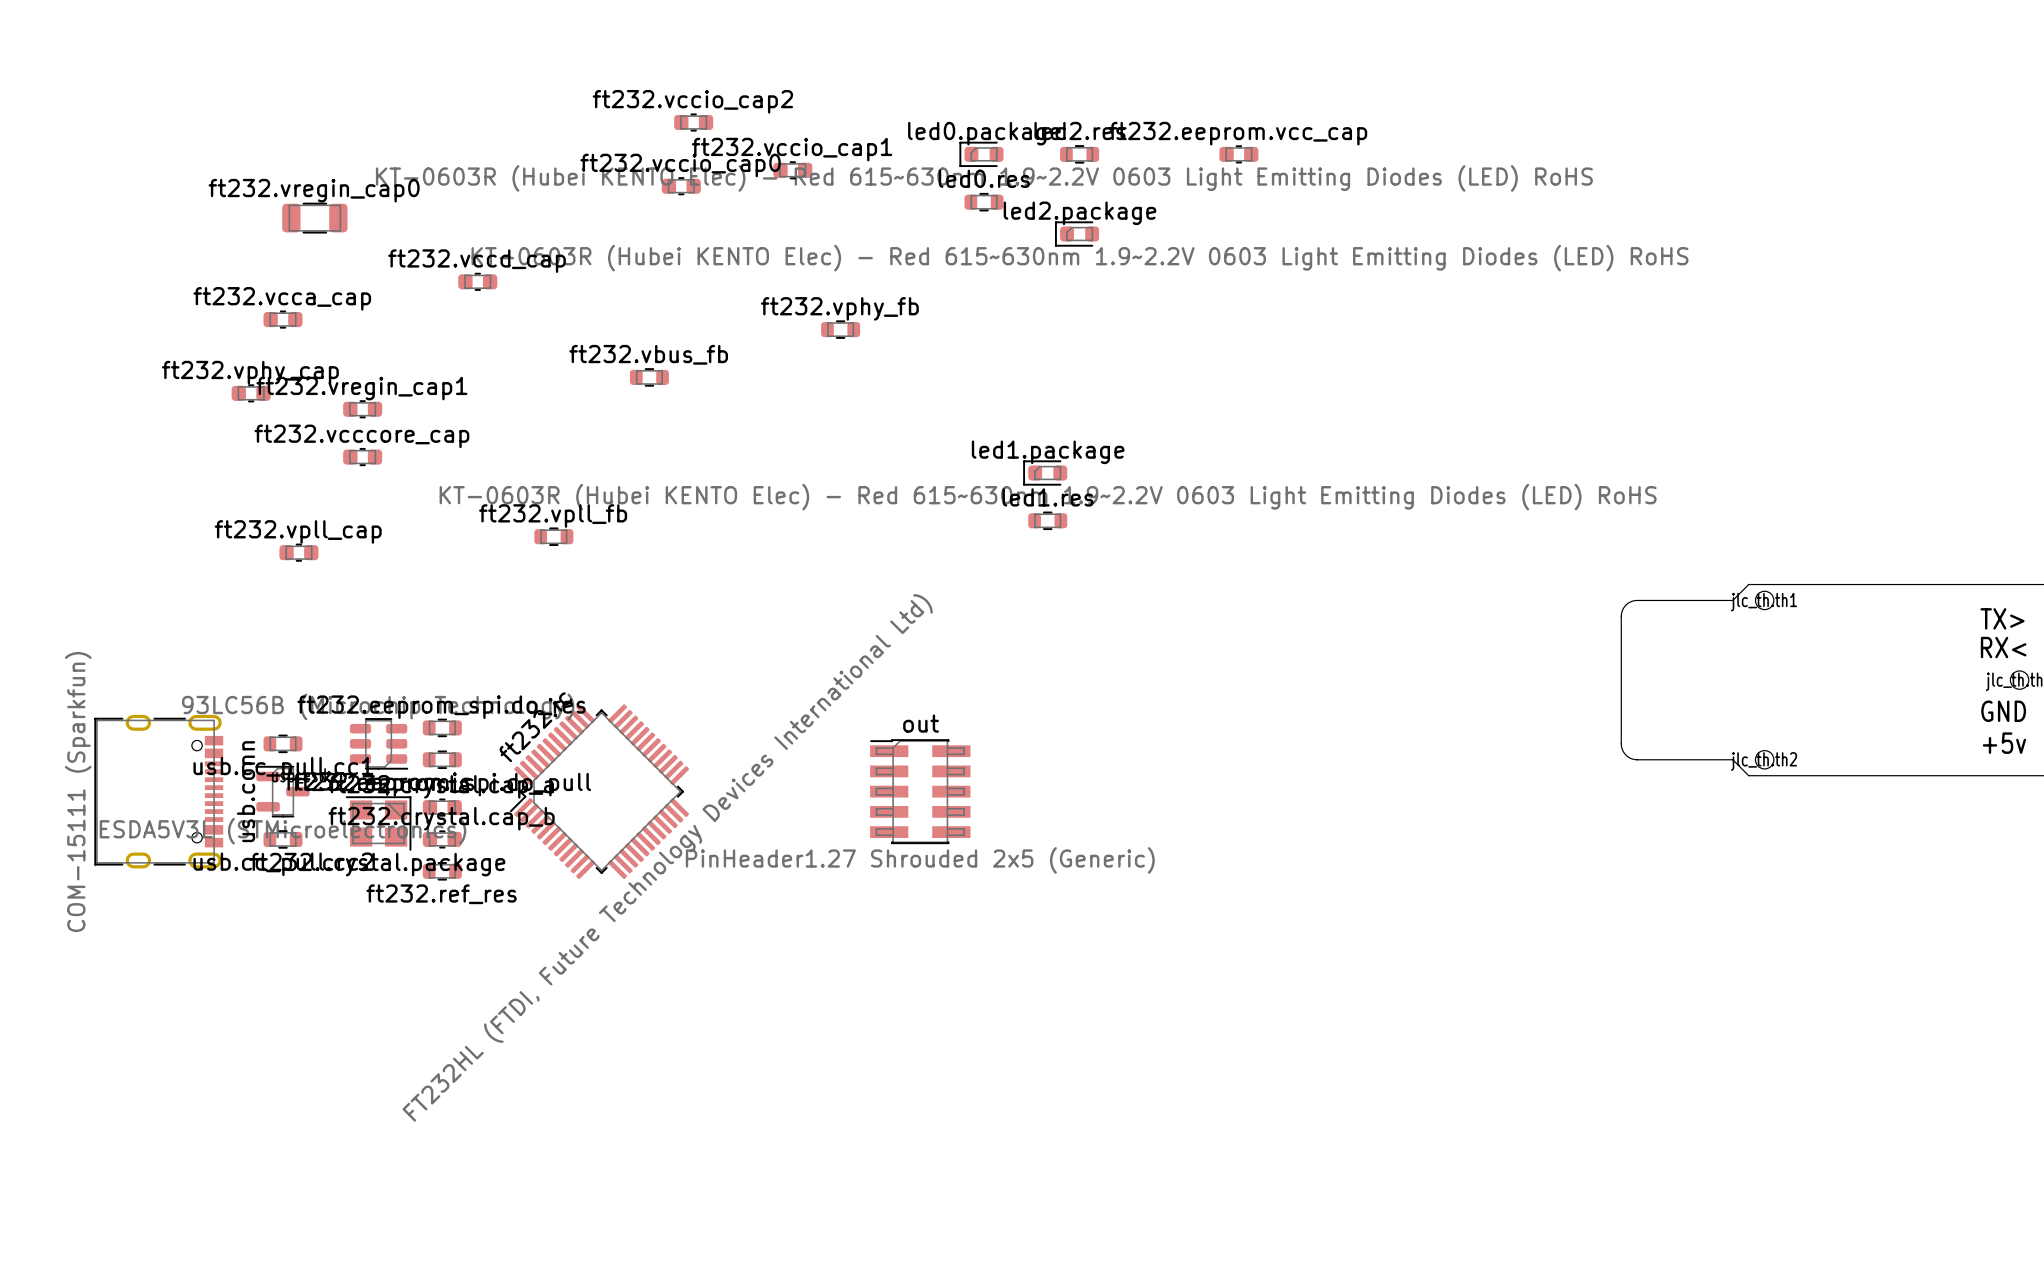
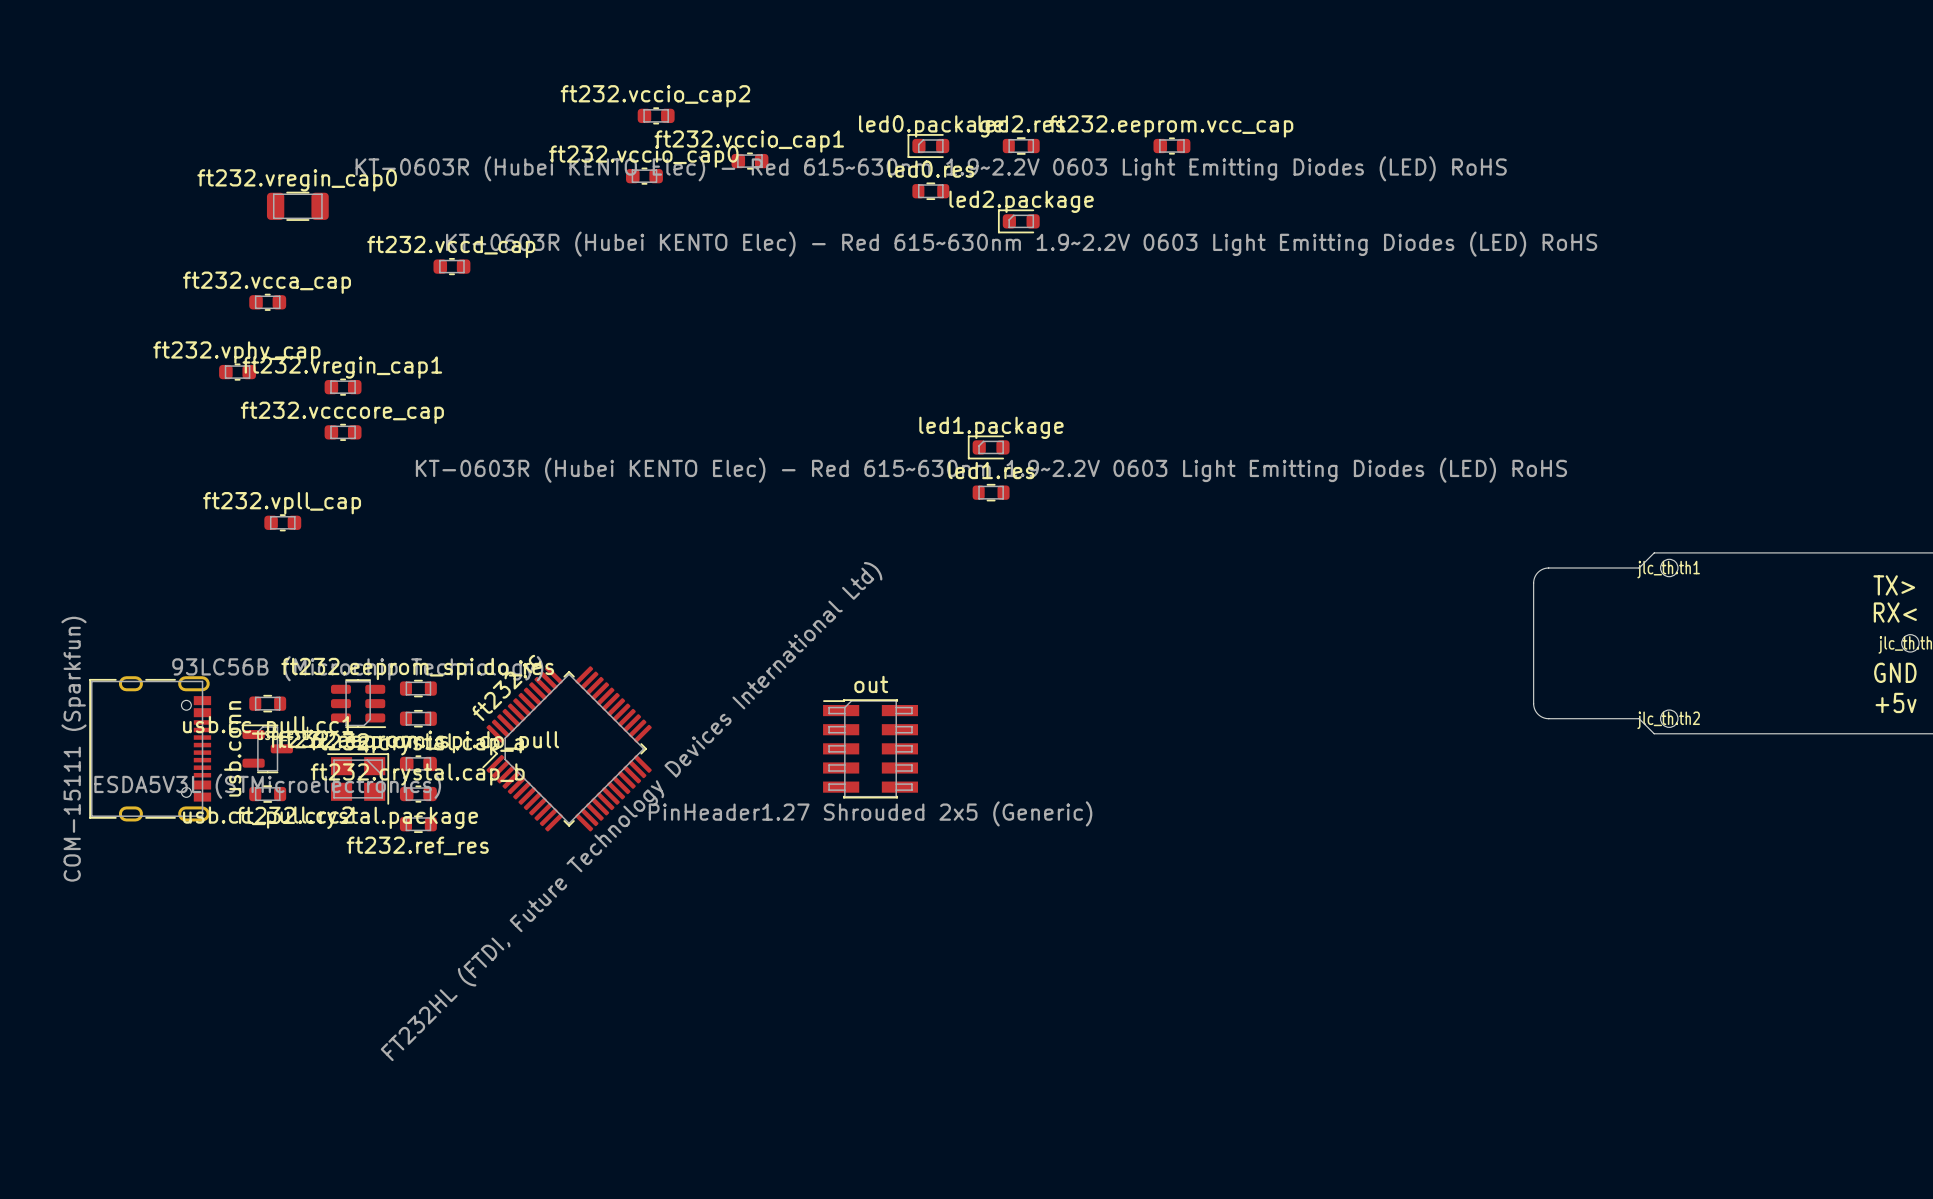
ft232.vphy_fb: (840, 329) -> none
ft232.vbus_fb: (649, 377) -> none
ft232.vpll_fb: (553, 536) -> none

